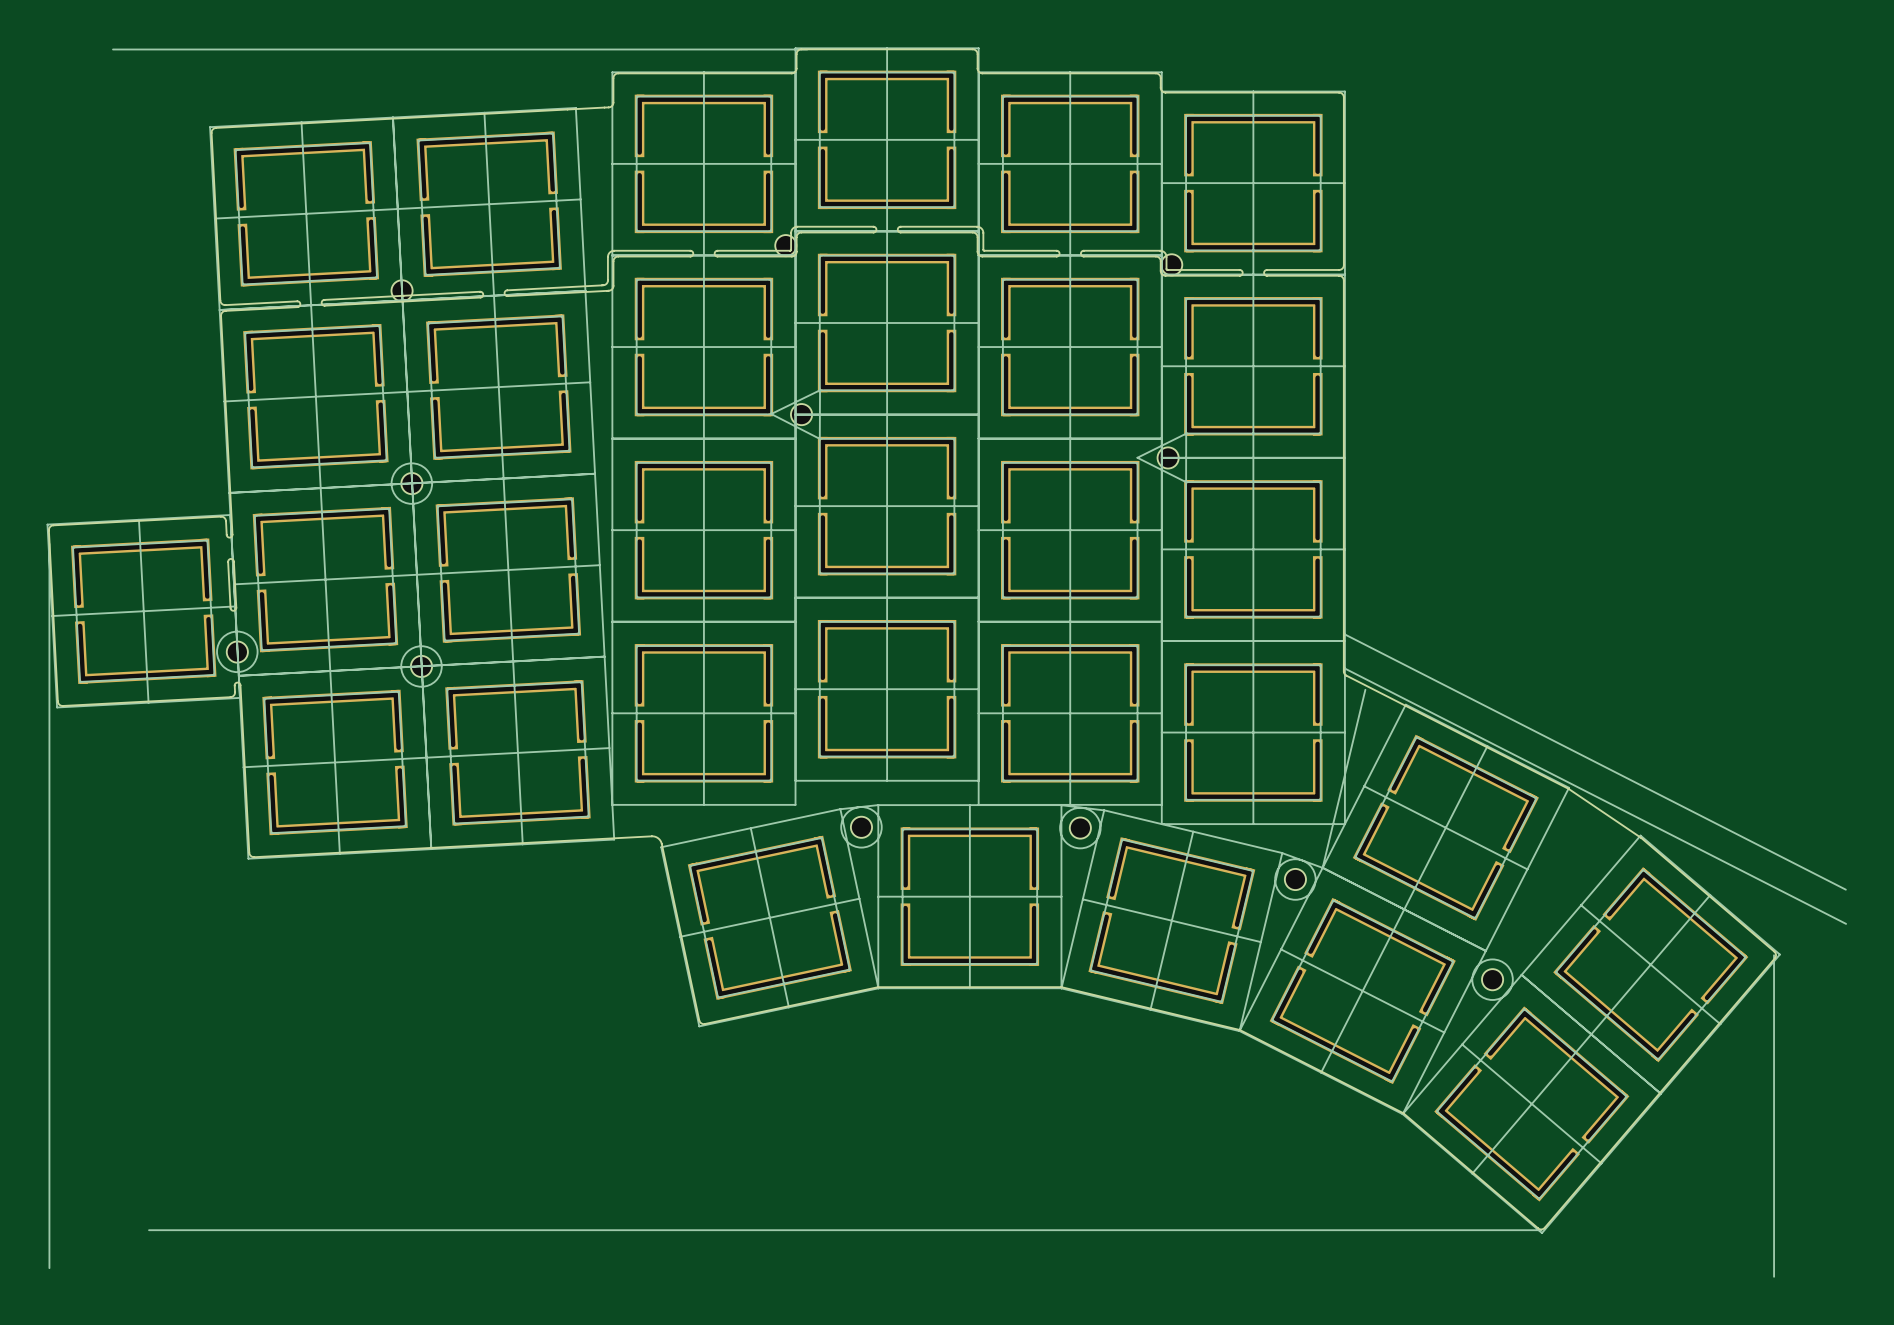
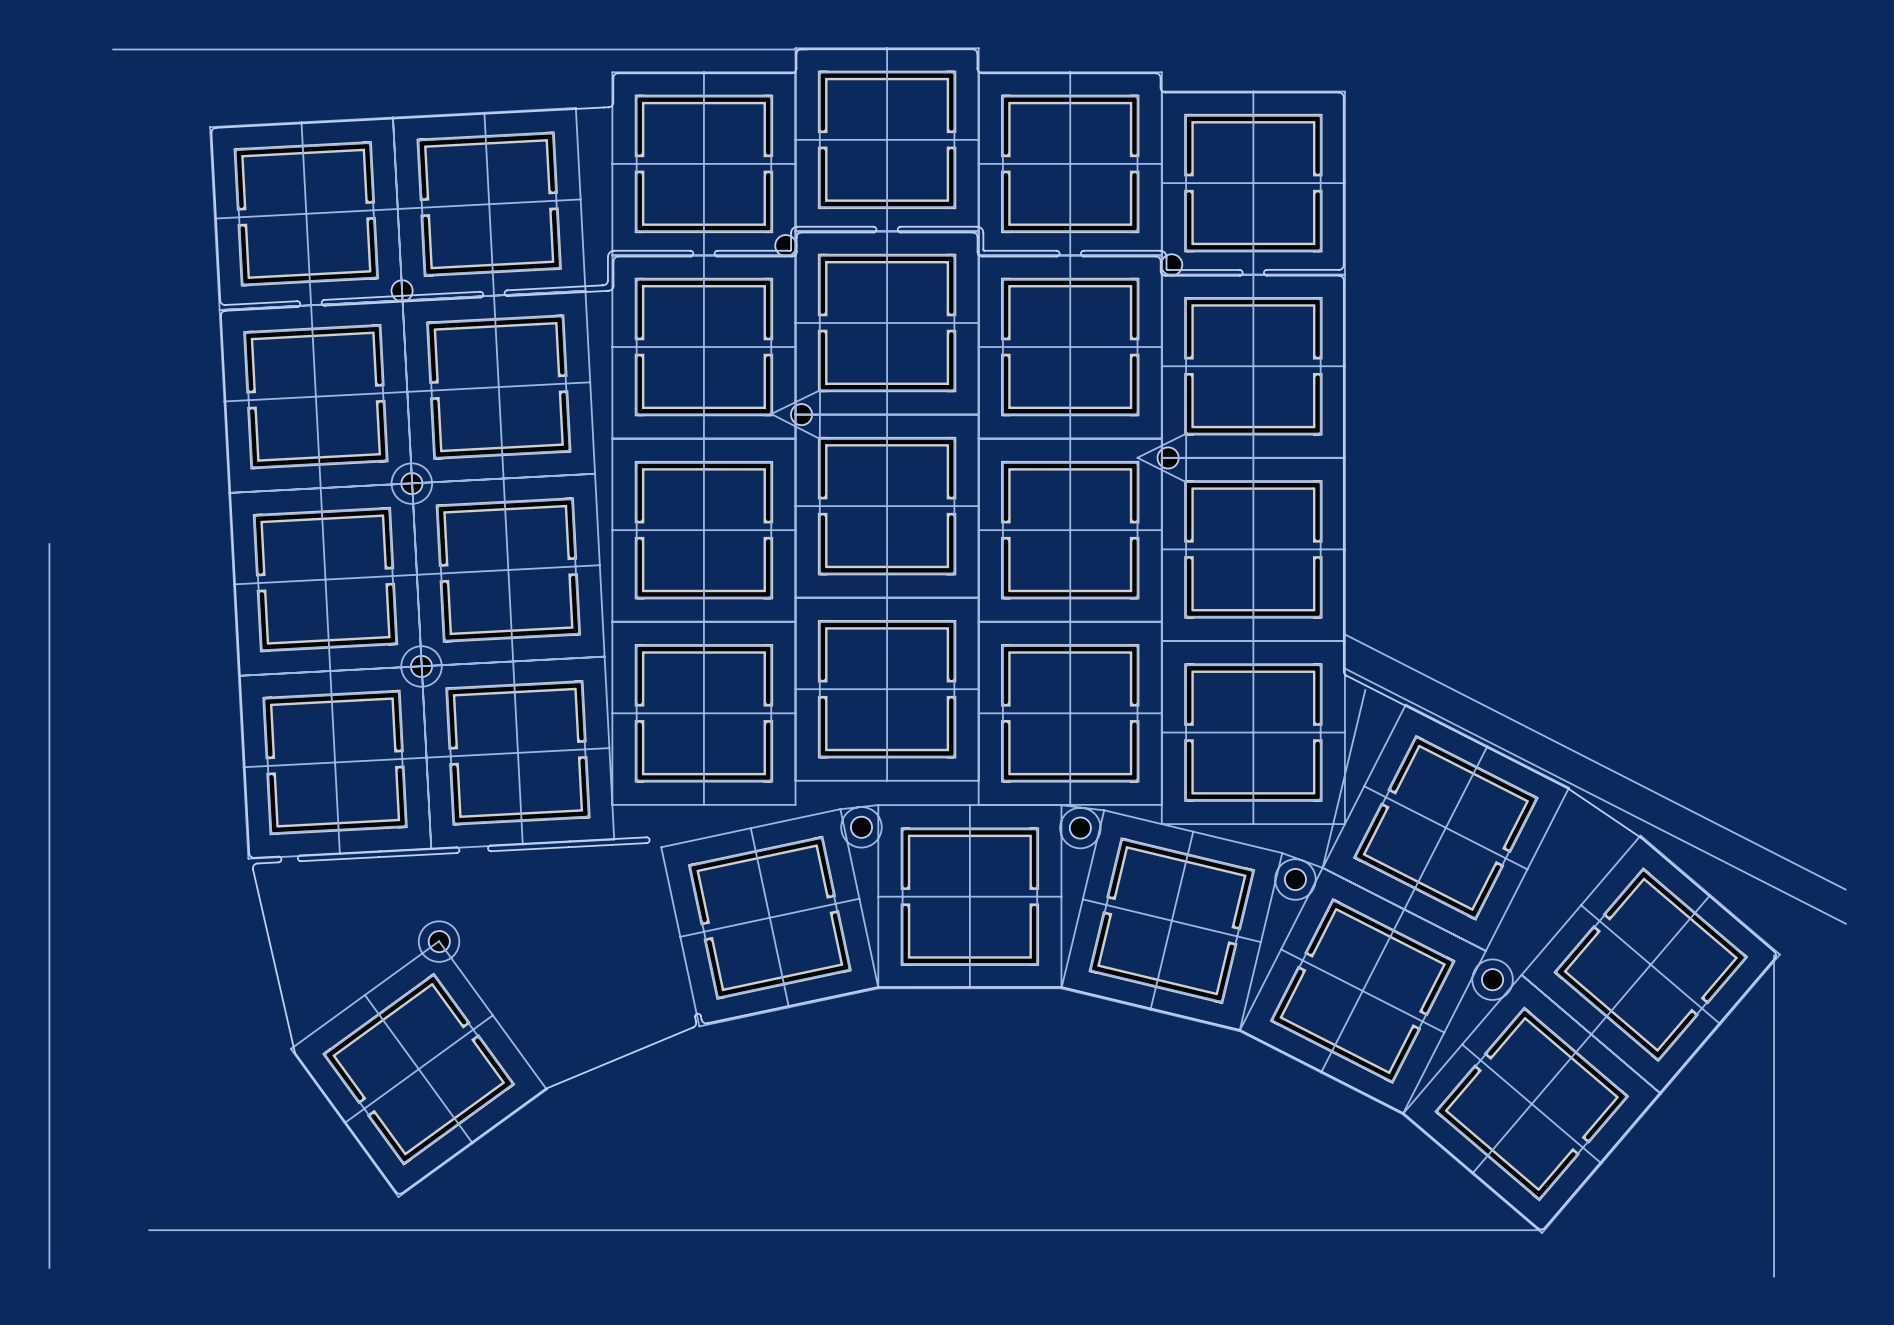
board edge: (1343, 280) (1339, 275) (1266, 275) (1264, 272) (1266, 270) (1339, 269) (1343, 267) (1343, 97) (1339, 92) (1164, 92) (1160, 89) (1160, 76) (1156, 73) (981, 73) (977, 69) (977, 52) (973, 49) (801, 49) (796, 52) (796, 69) (792, 73) (616, 73) (613, 77) (613, 103) (609, 107) (215, 128) (211, 132) (220, 302) (225, 305) (297, 301) (300, 304) (297, 307) (225, 310) (221, 314) (232, 535) (229, 537) (227, 536) (225, 519) (221, 516) (53, 525) (48, 529) (58, 703) (62, 705) (230, 697) (234, 693) (235, 683) (239, 683) (249, 852) (252, 856) (654, 836) (659, 839) (661, 843) (699, 1020) (702, 1023) (878, 987) (1061, 987) (1239, 1030) -> (1343, 280) (1339, 275) (1266, 275) (1263, 272) (1266, 269) (1338, 269) (1343, 266) (1343, 97) (1339, 92) (1164, 92) (1160, 89) (1160, 76) (1156, 73) (981, 73) (977, 69) (977, 52) (973, 49) (801, 49) (796, 52) (796, 69) (792, 73) (616, 73) (613, 77) (613, 103) (609, 107) (215, 127) (211, 132) (220, 302) (225, 304) (297, 301) (300, 303) (297, 306) (224, 310) (220, 315) (249, 853) (252, 857) (278, 856) (281, 859) (278, 862) (256, 863) (252, 868) (295, 1053) (396, 1192) (402, 1192) (545, 1088) (693, 1027) (696, 1023) (695, 1015) (697, 1013) (700, 1015) (702, 1022) (706, 1023) (878, 987) (1061, 987) (1239, 1029)
board edge: (233, 561) (236, 608) (233, 610) (230, 608) (228, 561) (230, 558) (233, 561) -> none
part: (143, 611) -> none
drawing: [216, 630, 259, 673] -> none
part: (237, 652) -> none
board edge: none -> (646, 837) (490, 845) (488, 848) (491, 851) (646, 843) (649, 840) (646, 837)
board edge: none -> (456, 847) (300, 855) (297, 858) (300, 861) (456, 853) (459, 850) (456, 847)
drawing: none -> [418, 920, 461, 963]
part: none -> (439, 941)
part: none -> (418, 1069)

